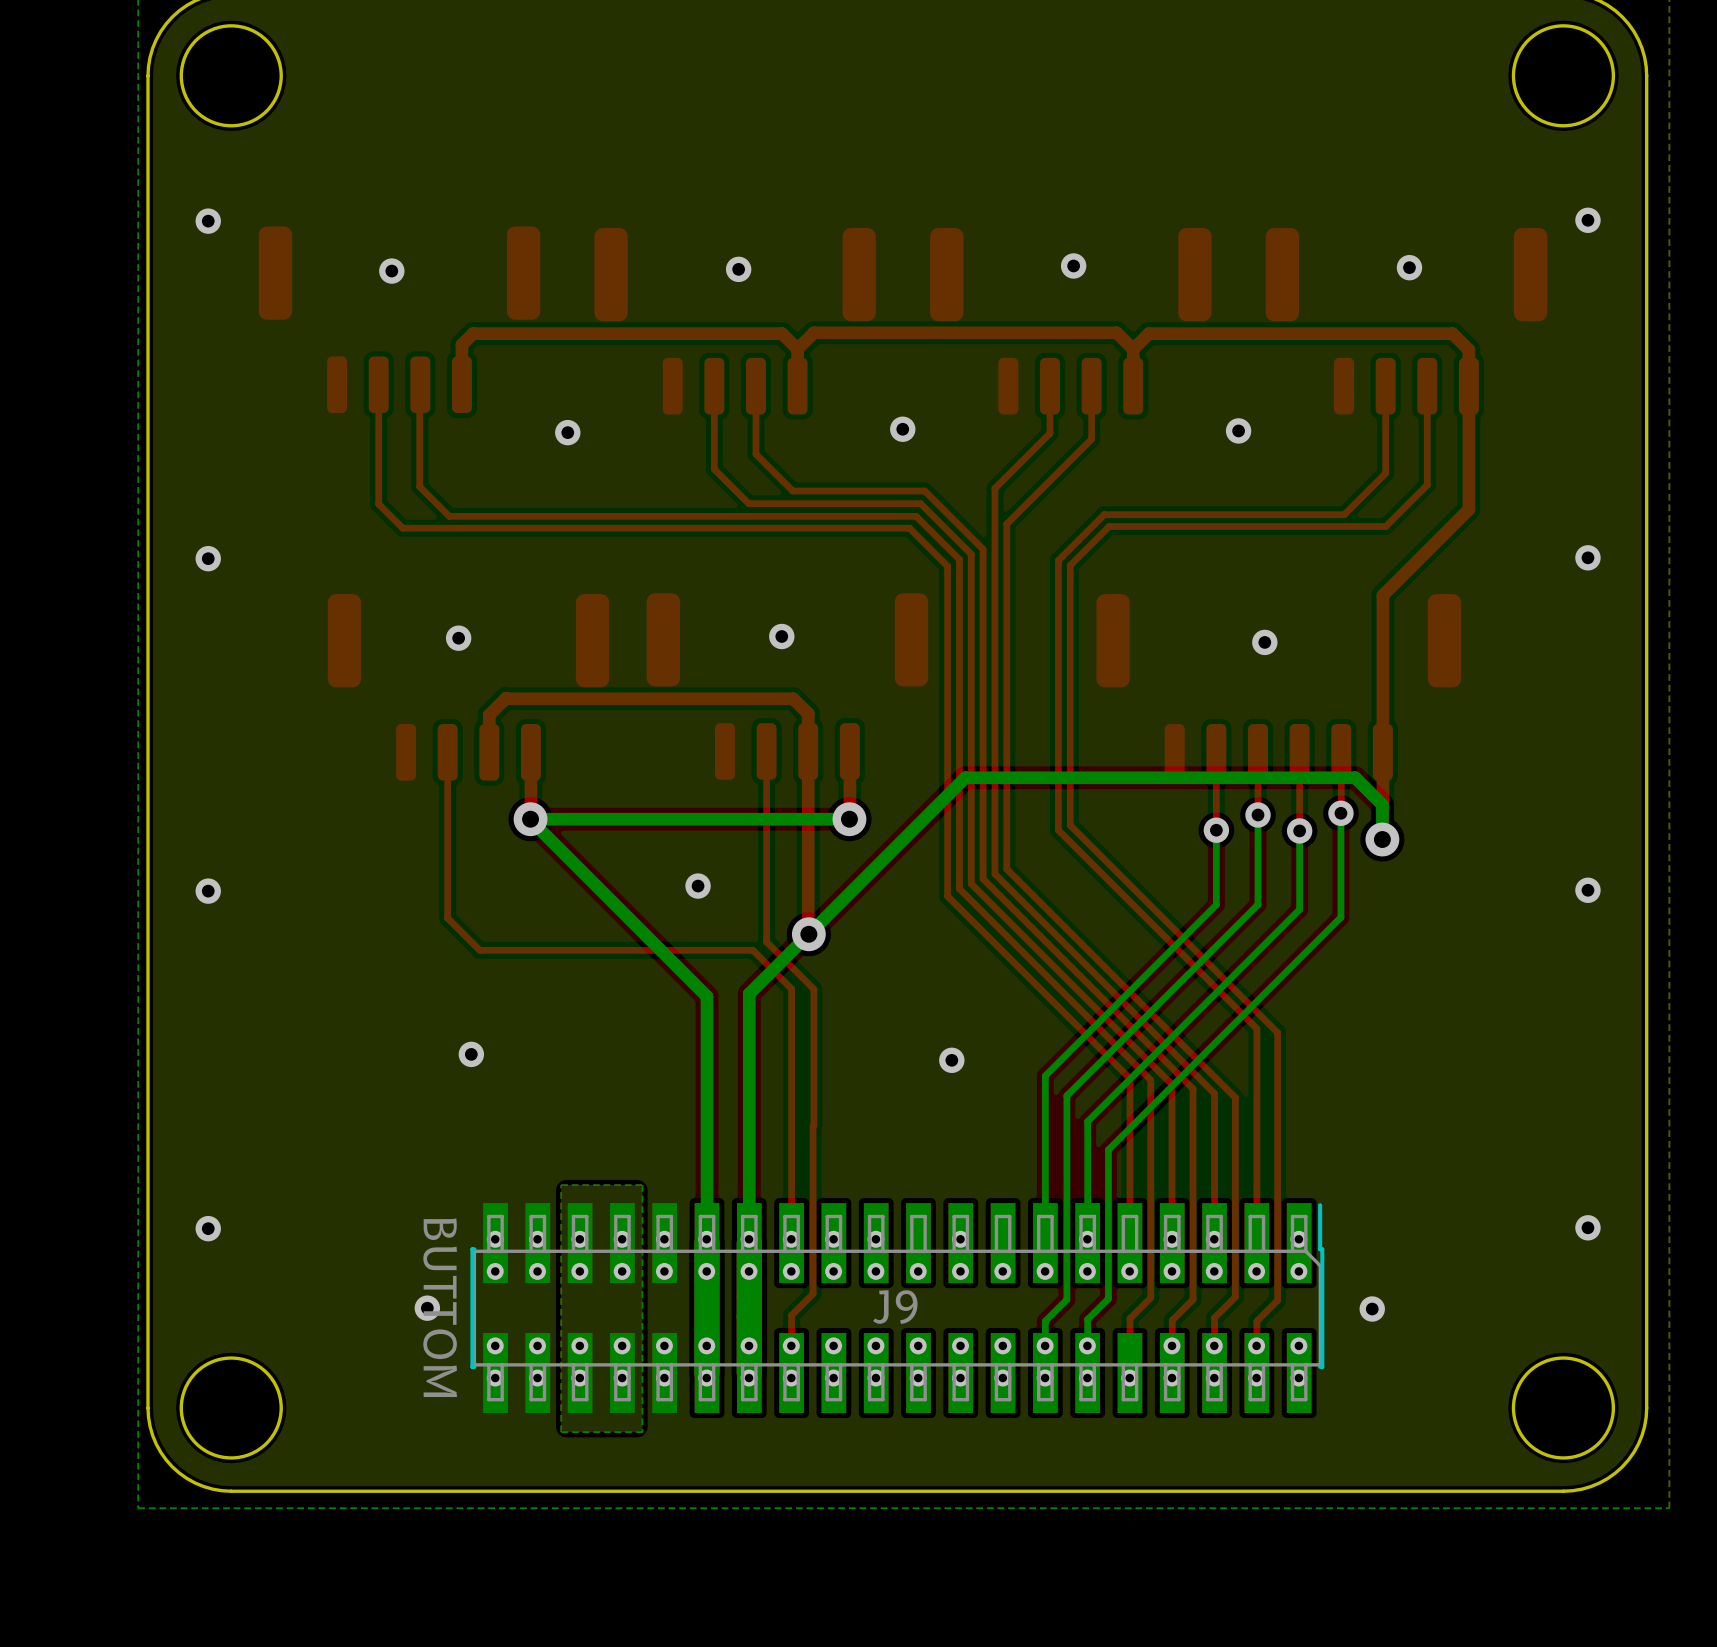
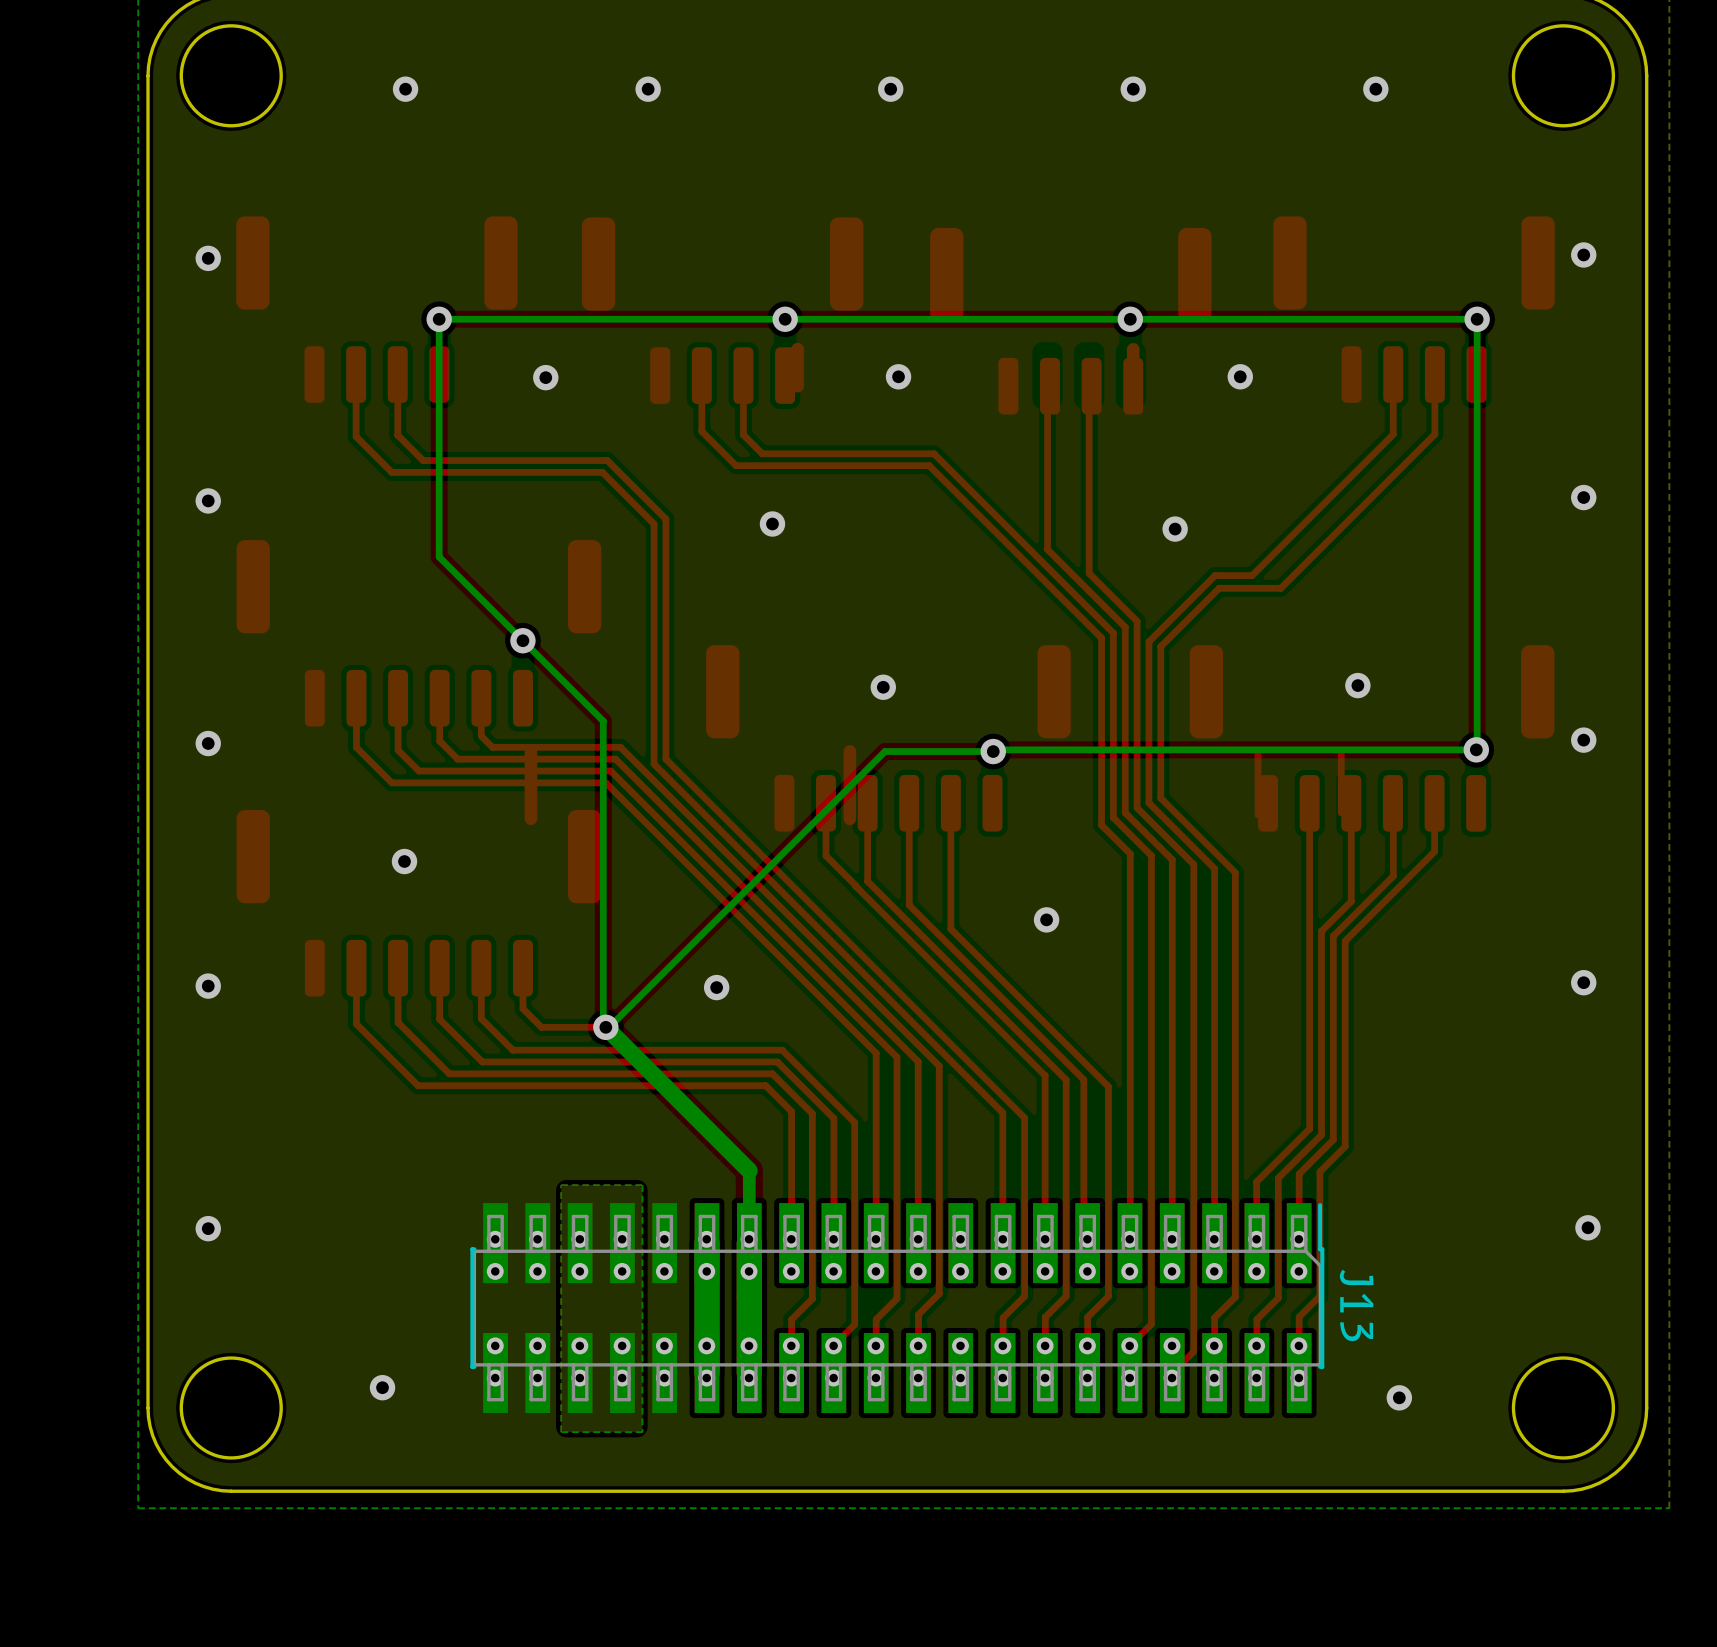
via: none -> (405, 89)
via: none -> (648, 89)
via: none -> (890, 89)
via: none -> (1133, 89)
via: none -> (1375, 89)
via position: (1587, 220) -> (1583, 254)
via position: (208, 221) -> (208, 258)
via: (1073, 265) -> none
via: (1409, 267) -> none
via position: (738, 269) -> (785, 319)
via position: (391, 271) -> (439, 319)
part position: (399, 319) -> (376, 309)
via: none -> (1130, 319)
via: none -> (1477, 319)
part position: (735, 321) -> (722, 310)
part position: (1406, 321) -> (1414, 309)
top track: none -> (356, 374) (356, 436) (391, 472) (602, 472) (654, 523) (654, 764) (1002, 1112) (1002, 1239)
top track: none -> (397, 374) (397, 435) (423, 460) (607, 460) (665, 519) (665, 759) (1024, 1117) (1024, 1296) (1003, 1317) (1003, 1373)
top track: none -> (701, 375) (701, 431) (736, 465) (929, 465) (1101, 638) (1101, 825) (1130, 853) (1129, 1239)
top track: none -> (743, 375) (743, 434) (762, 453) (934, 453) (1113, 633) (1113, 817) (1151, 855) (1151, 1324) (1129, 1345)
top track: none -> (1047, 375) (1047, 549) (1125, 627) (1125, 812) (1172, 859) (1172, 1243)
top track: (378, 384) (378, 504) (402, 528) (909, 528) (947, 566) (947, 896) (1129, 1078) (1129, 1243) -> none
top track: (420, 384) (419, 486) (449, 516) (916, 516) (959, 559) (959, 888) (1150, 1080) (1150, 1297) (1129, 1318) (1129, 1373) -> none
top track: (461, 384) (461, 344) (473, 333) (782, 333) (797, 349) (813, 332) (1116, 332) (1133, 349) (1148, 333) (1452, 333) (1468, 349) (1468, 509) (1382, 595) (1382, 839) -> none
top track: (714, 386) (714, 469) (748, 503) (920, 503) (971, 554) (971, 883) (1172, 1084) (1172, 1239) -> none
top track: (755, 386) (755, 454) (792, 491) (924, 491) (983, 549) (983, 878) (1193, 1088) (1193, 1299) (1172, 1320) (1172, 1373) -> (1089, 375) (1089, 573) (1137, 621) (1137, 807) (1193, 864) (1193, 1351) (1172, 1373)
top track: (1050, 386) (1050, 433) (994, 488) (994, 874) (1214, 1093) -> (1393, 374) (1393, 434) (1252, 575) (1215, 575) (1148, 641) (1148, 802) (1214, 868) (1214, 1093)
top track: (1091, 386) (1091, 439) (1006, 523) (1006, 869) (1235, 1097) -> (1434, 374) (1434, 434) (1280, 588) (1219, 588) (1160, 646) (1160, 798) (1235, 872) (1235, 1097)
top track: (1385, 386) (1385, 473) (1344, 514) (1104, 514) (1058, 560) (1058, 830) (1256, 1028) (1256, 1243) -> none
top track: (1427, 386) (1427, 485) (1385, 526) (1109, 526) (1070, 565) (1070, 825) (1277, 1032) (1277, 1300) (1256, 1321) -> (1351, 803) (1351, 901) (1321, 931) (1321, 1134) (1278, 1178) (1278, 1298) (1256, 1321)
via position: (902, 429) -> (898, 376)
via position: (1238, 430) -> (1240, 376)
via position: (567, 432) -> (545, 377)
via: none -> (772, 523)
via: none -> (1175, 529)
via position: (1587, 557) -> (1583, 497)
via position: (208, 558) -> (208, 500)
part: none -> (418, 633)
via: (781, 636) -> none
via position: (458, 638) -> (522, 640)
via: (1264, 642) -> none
via: none -> (1357, 685)
part: (787, 686) -> none
part: (468, 687) -> none
via: none -> (883, 687)
part position: (1278, 687) -> (1372, 738)
top track: none -> (356, 698) (356, 747) (391, 782) (605, 782) (876, 1053) (876, 1243)
top track: none -> (398, 698) (398, 750) (418, 771) (610, 771) (896, 1057) (896, 1298) (876, 1319) (876, 1373)
top track: none -> (439, 698) (439, 741) (457, 759) (615, 759) (918, 1061) (918, 1239)
top track: none -> (481, 698) (481, 736) (492, 747) (620, 747) (939, 1066) (939, 1293) (918, 1314) (918, 1373)
part: none -> (888, 738)
via: none -> (1583, 740)
via: none -> (208, 743)
via: none -> (1476, 749)
top track: (766, 751) (766, 941) (813, 989) (813, 1293) (791, 1315) (791, 1319) -> (398, 968) (398, 1022) (449, 1073) (772, 1073) (812, 1113) (812, 1298) (791, 1319)
via: none -> (993, 751)
top track: (447, 752) (447, 918) (479, 950) (753, 950) (791, 988) (791, 1111) -> (356, 968) (356, 1024) (418, 1085) (765, 1085) (791, 1111)
top track: (489, 752) (489, 714) (506, 698) (793, 698) (808, 713) (808, 934) -> none
top track: (1216, 752) (1216, 830) -> none
top track: (1299, 752) (1299, 830) -> none
top track: none -> (825, 803) (825, 855) (1045, 1075) (1045, 1239)
top track: none -> (867, 803) (867, 881) (1066, 1079) (1066, 1296) (1045, 1317) (1045, 1373)
top track: none -> (909, 803) (909, 905) (1083, 1079) (1083, 1239) (1087, 1243)
top track: none -> (950, 803) (950, 929) (1108, 1086) (1108, 1296) (1087, 1317) (1087, 1373)
top track: none -> (1309, 803) (1309, 1128) (1256, 1181) (1256, 1239)
top track: none -> (1392, 803) (1393, 876) (1333, 936) (1333, 1139) (1299, 1174) (1299, 1243)
top track: none -> (1434, 803) (1434, 851) (1345, 941) (1345, 1146) (1319, 1171) (1319, 1296) (1299, 1316) (1299, 1373)
bottom track: (1340, 813) (1340, 917) (1108, 1149) (1108, 1298) (1087, 1319) (1087, 1373) -> none
via: (1340, 813) -> none
bottom track: (1258, 814) (1258, 904) (1066, 1095) (1066, 1299) (1045, 1321) (1045, 1373) -> none
via: (1258, 814) -> none
via: (530, 819) -> none
bottom track: (849, 819) (530, 819) (707, 996) (707, 1243) -> none
via: (849, 819) -> none
bottom track: (1216, 830) (1216, 904) (1045, 1075) (1045, 1243) -> none
via: (1216, 830) -> none
bottom track: (1299, 830) (1299, 909) (1087, 1121) (1087, 1243) -> none
via: (1299, 830) -> none
bottom track: (1382, 839) (1382, 804) (1355, 777) (965, 777) (749, 993) (749, 1170) -> (605, 1027) (749, 1170)
via: (1382, 839) -> none
via: none -> (404, 861)
via: (698, 886) -> none
via: (1587, 890) -> none
via: (208, 891) -> none
part: none -> (418, 903)
via: none -> (1046, 919)
via: (808, 934) -> none
top track: none -> (522, 958) (522, 1008) (541, 1027) (605, 1027)
top track: none -> (439, 968) (439, 1019) (482, 1062) (777, 1062) (833, 1118) (833, 1243)
top track: none -> (481, 968) (481, 1018) (512, 1050) (782, 1050) (854, 1122) (854, 1324) (833, 1345) (833, 1373)
via: none -> (1583, 982)
via: none -> (208, 986)
via: none -> (716, 987)
bottom track: none -> (605, 1027) (603, 1024) (603, 721) (439, 556) (439, 319) (1477, 319) (1476, 749) (884, 751) (609, 1027) (605, 1027)
via: none -> (605, 1027)
via: (471, 1054) -> none
via: (951, 1060) -> none
via: none -> (918, 1239)
via: none -> (1002, 1239)
via: none -> (1045, 1239)
via: none -> (1129, 1239)
via: none -> (1256, 1239)
J9 value: BUTTOM (440, 1307) -> none
J9 name: J9 (895, 1307) -> J13 (1356, 1305)
via position: (427, 1308) -> (382, 1387)
via position: (1372, 1309) -> (1399, 1397)
via: none -> (1129, 1345)

